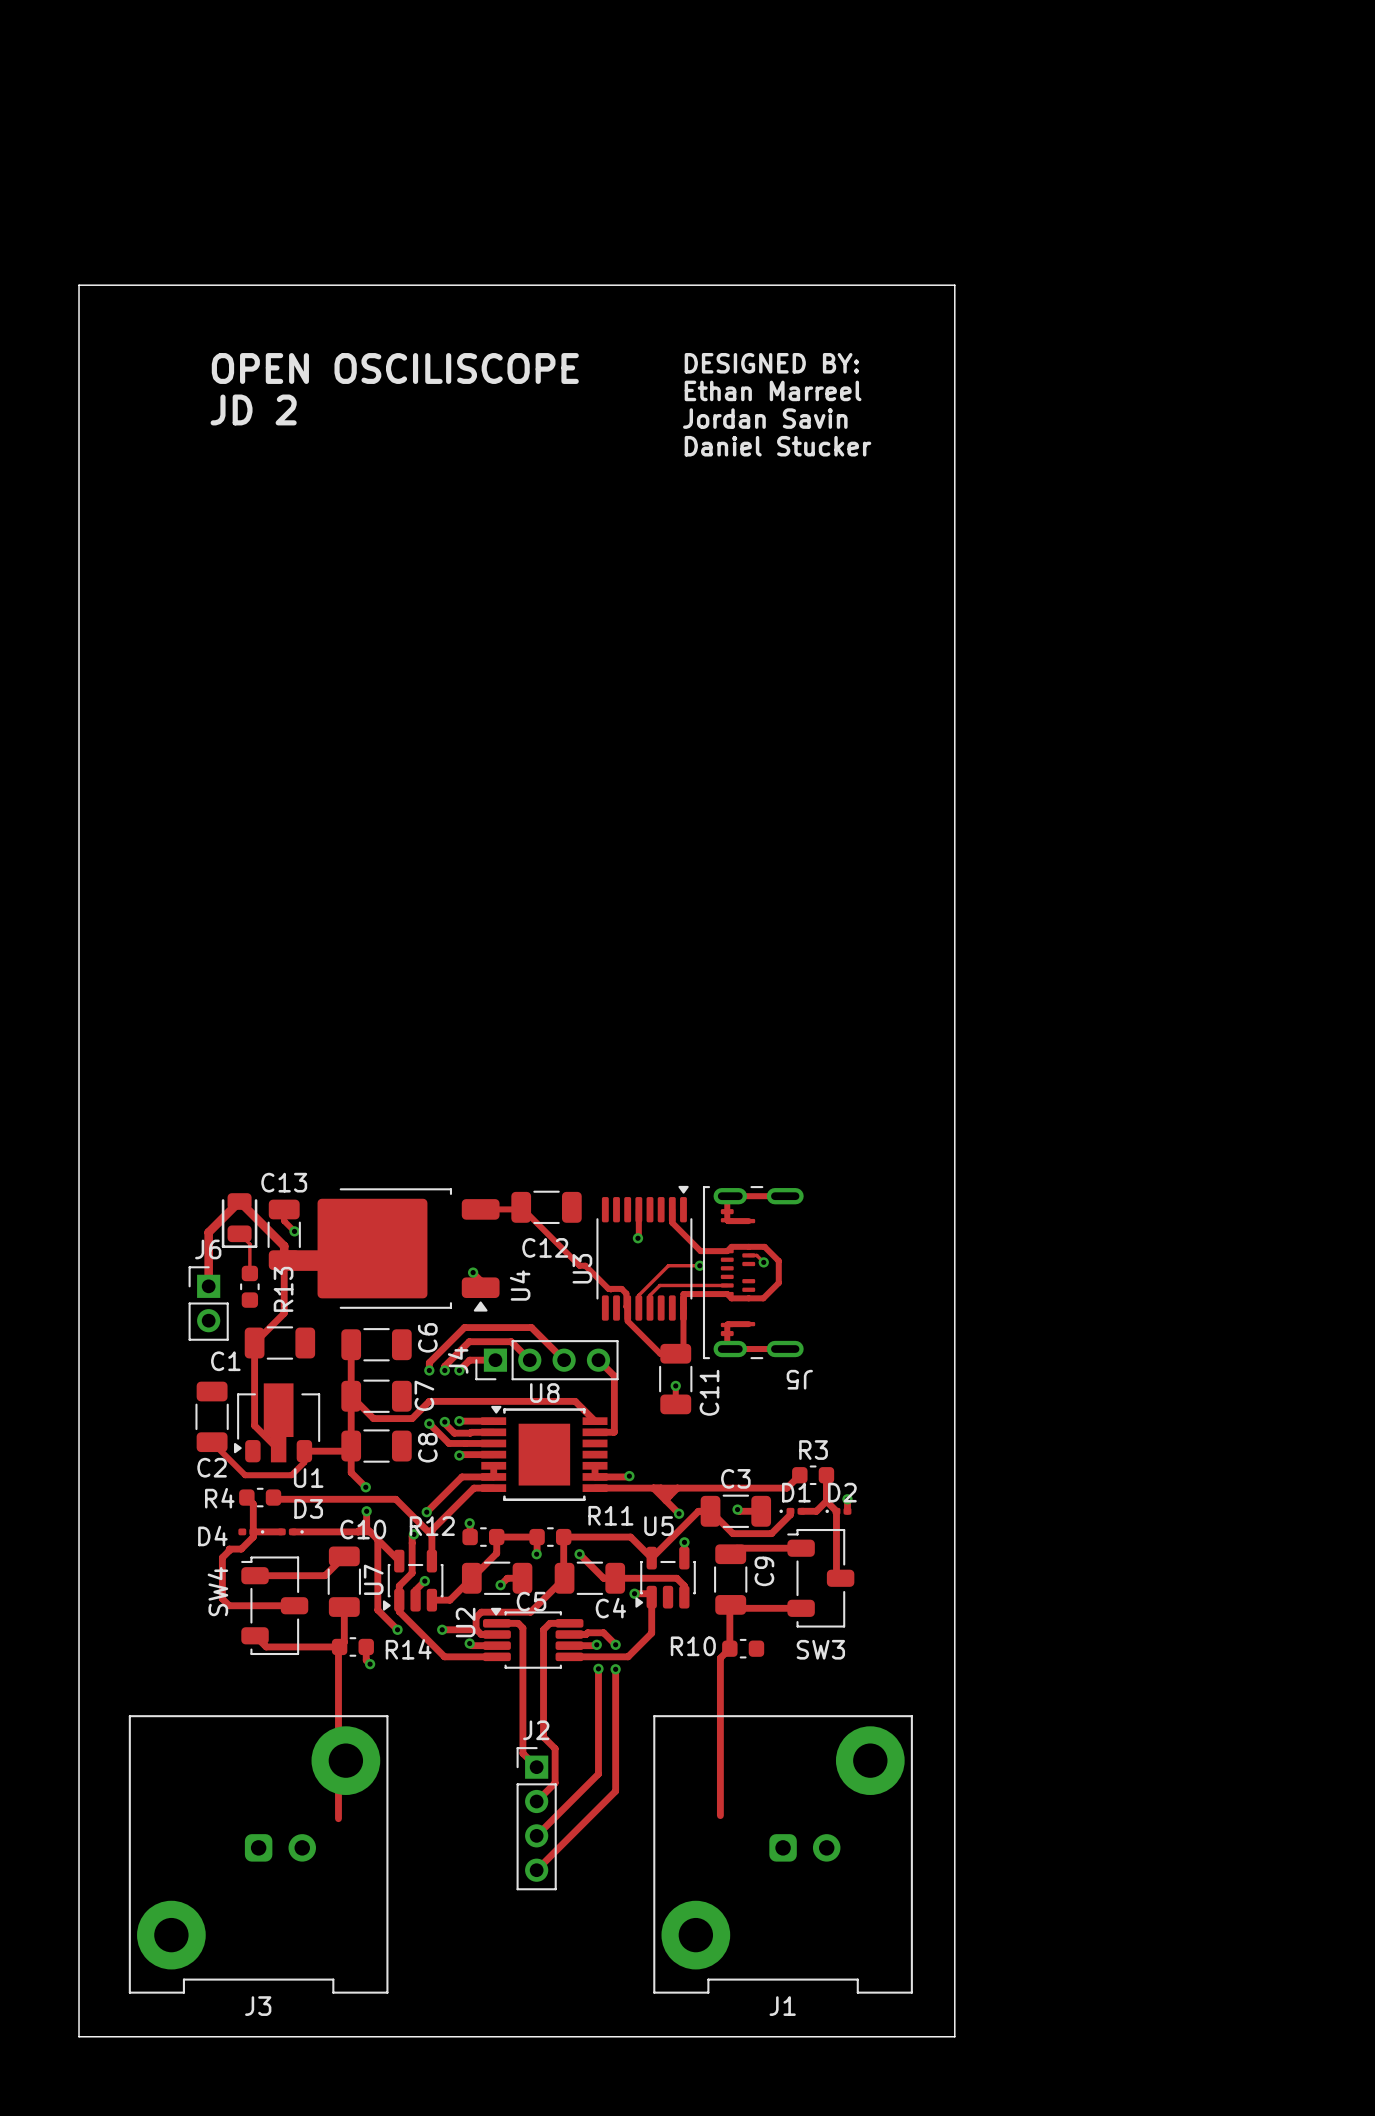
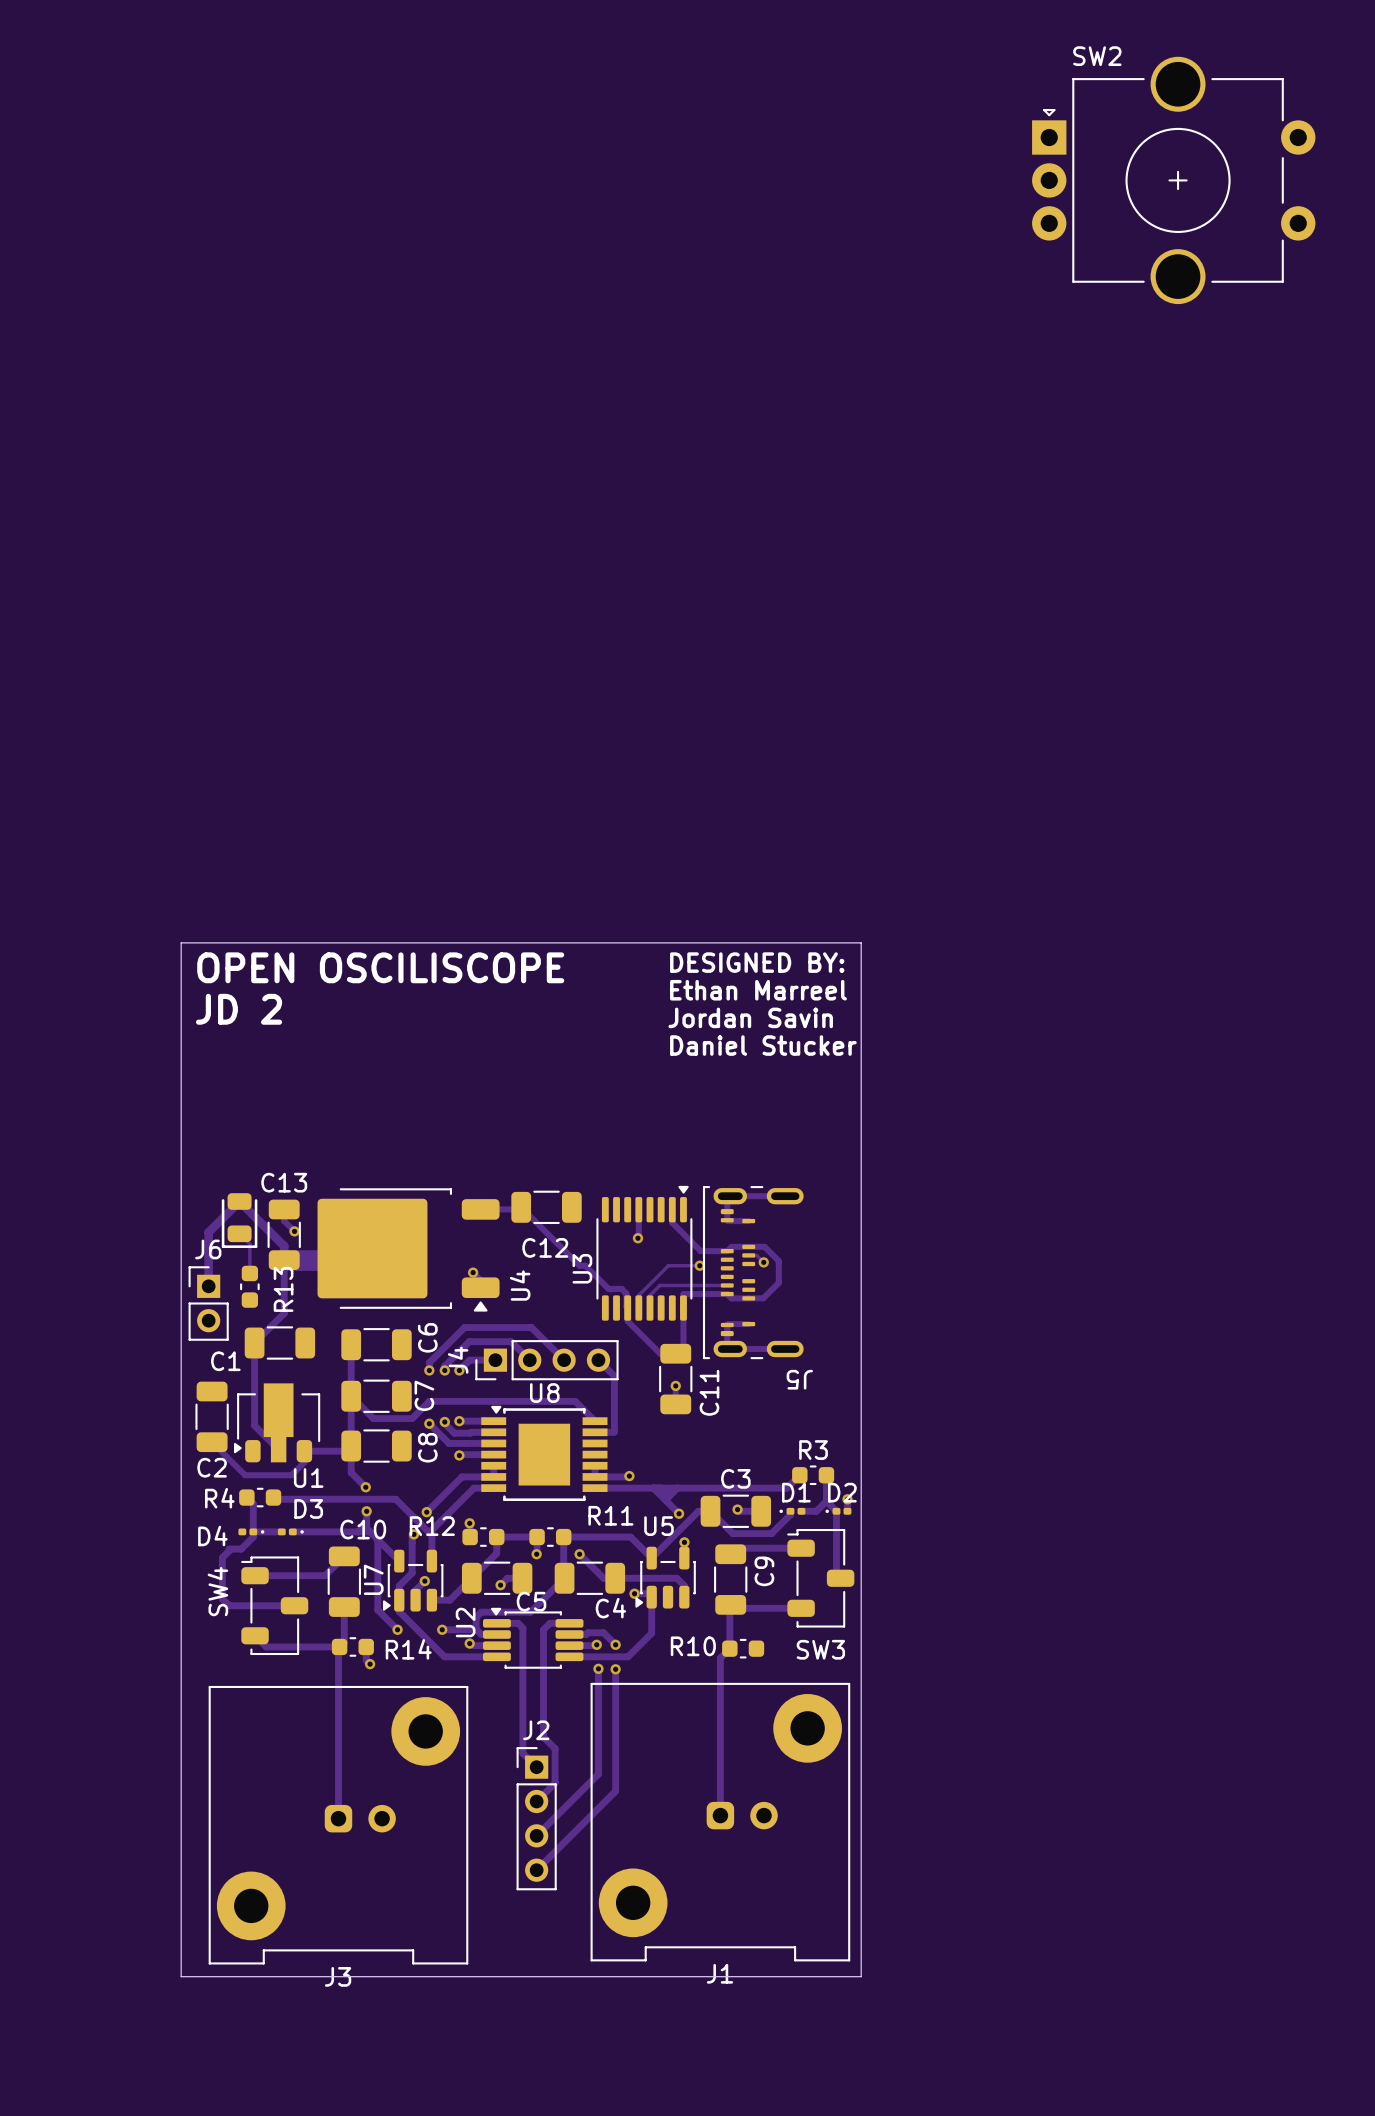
SW2: none -> (1173, 180)
board edge: (79, 285) (954, 285) (954, 2036) (79, 2036) (79, 285) -> none
text: DESIGNED BY: (771, 363) -> none
text: OPEN OSCILISCOPE (395, 368) -> none
text: Ethan Marreel (773, 390) -> none
text: JD 2 (253, 409) -> none
text: Jordan Savin (765, 418) -> none
text: Daniel Stucker (777, 446) -> none
board edge: none -> (181, 942) (861, 942) (861, 1976) (181, 1976) (181, 942)
text: none -> DESIGNED BY: (757, 962)
text: none -> OPEN OSCILISCOPE (380, 967)
text: none -> Ethan Marreel (758, 990)
text: none -> JD 2 (239, 1009)
text: none -> Jordan Savin (750, 1017)
text: none -> Daniel Stucker (763, 1045)
J3 position: (258, 1854) -> (338, 1825)
J1 position: (783, 1854) -> (720, 1822)

